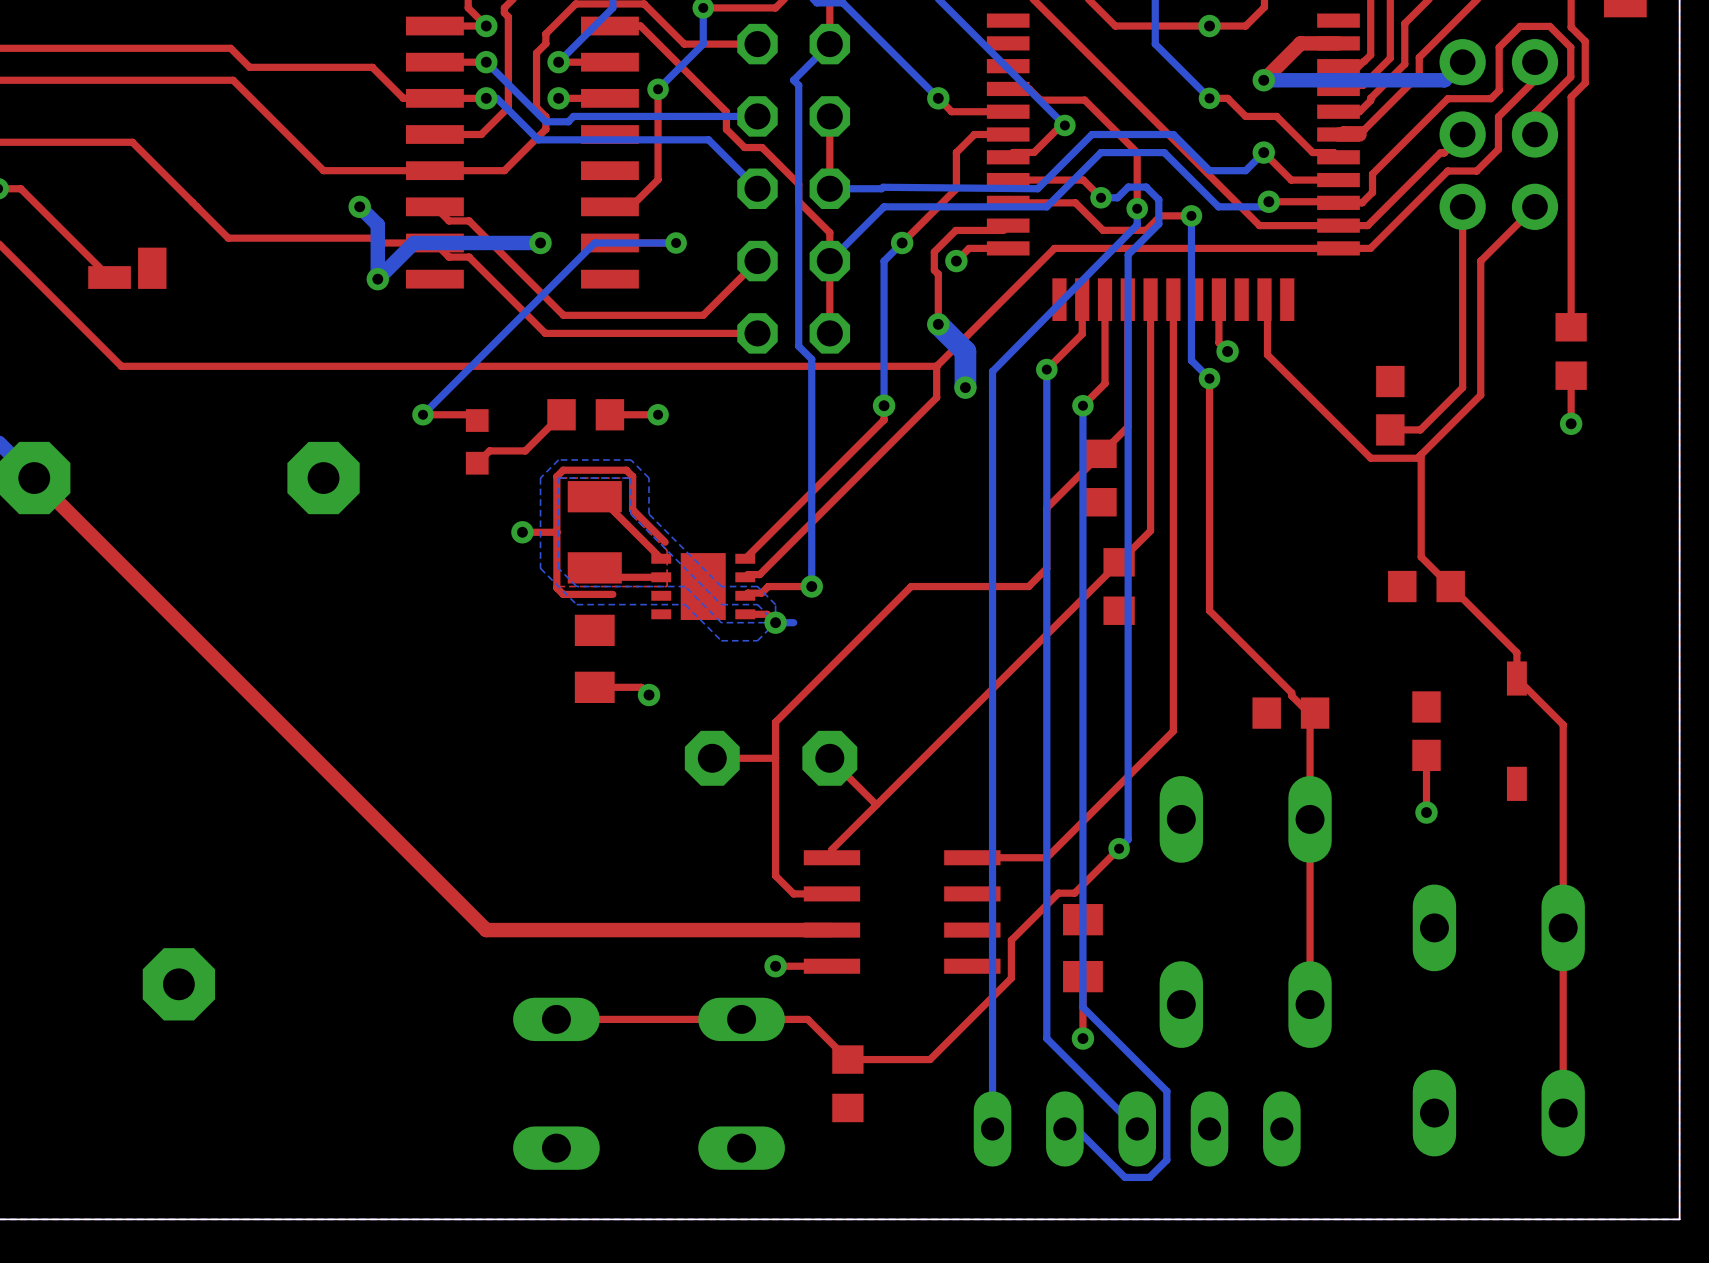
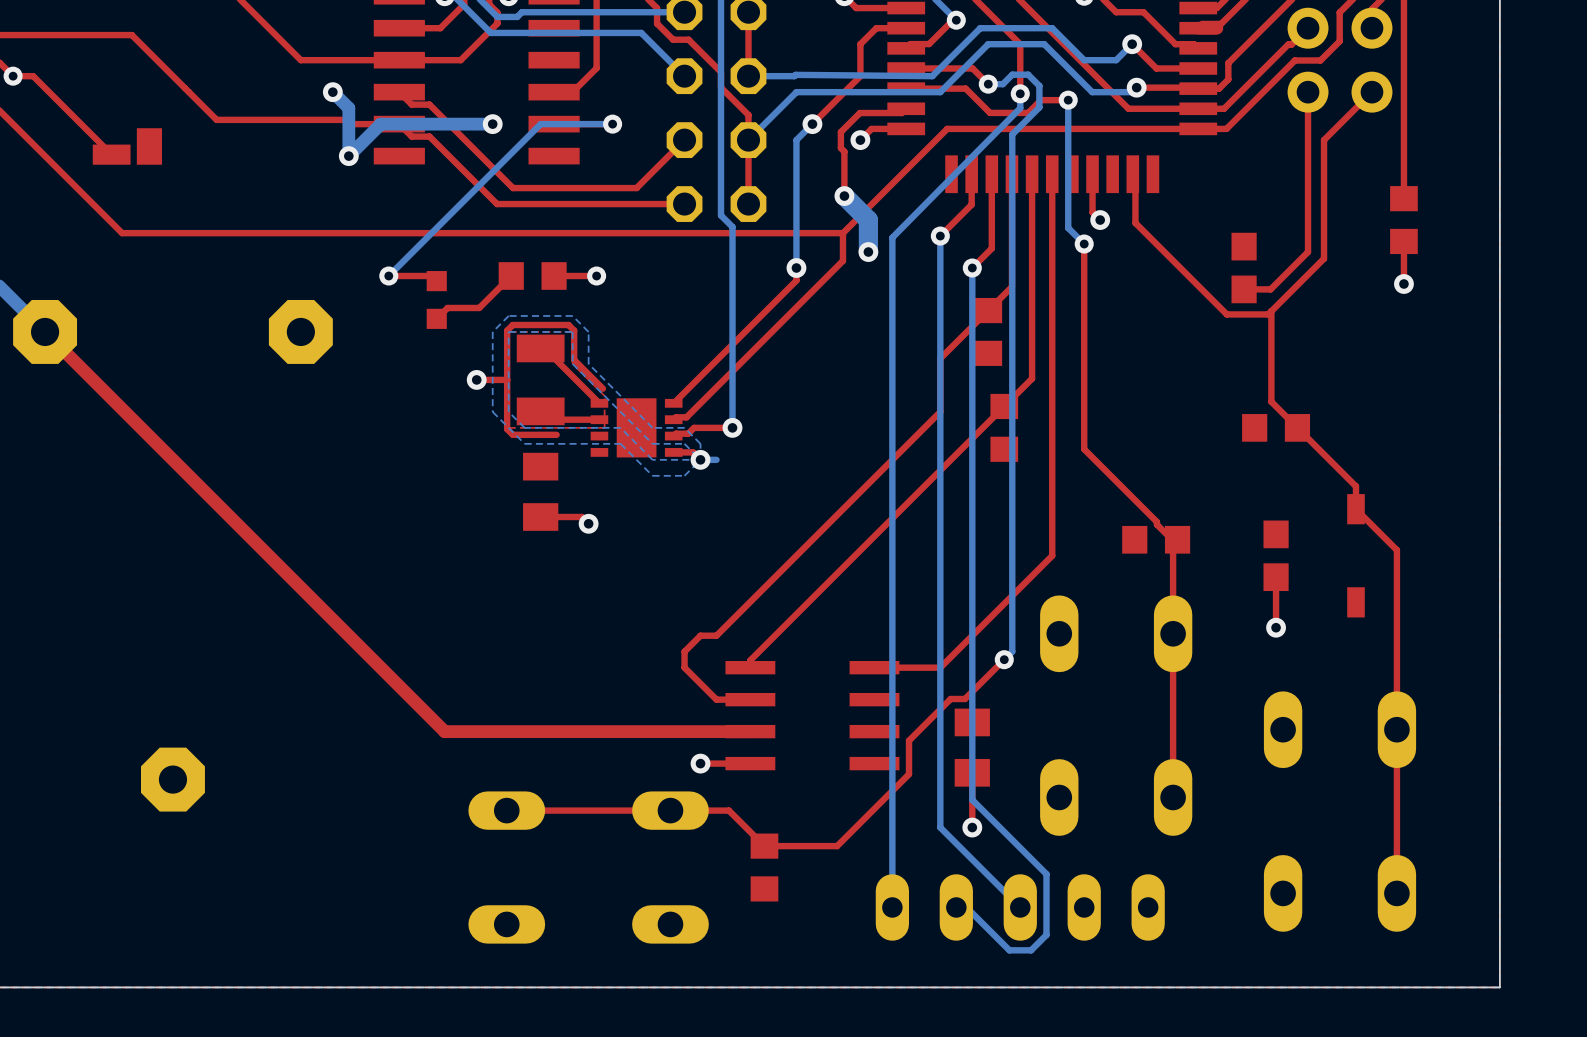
top track: (1028, 586) (911, 586) (775, 722) (775, 875) -> (924, 427) (716, 635) (700, 635) (684, 651) (684, 667) (700, 683)
part: (712, 758) -> none
top track: (775, 758) (712, 758) -> none
top track: (829, 758) (876, 804) -> none
part: (829, 758) -> none

